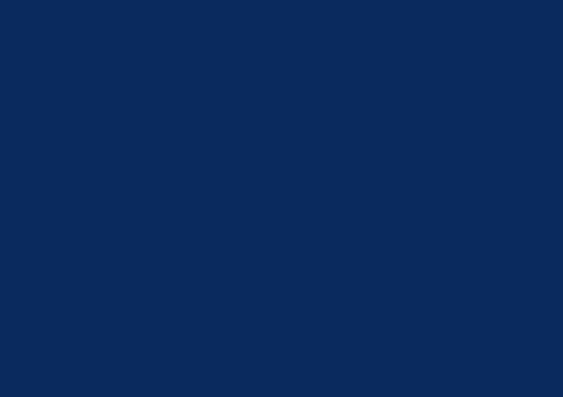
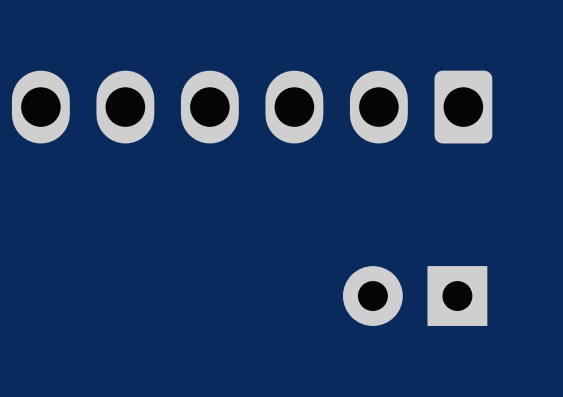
part: none -> (252, 107)
part: none -> (415, 296)

